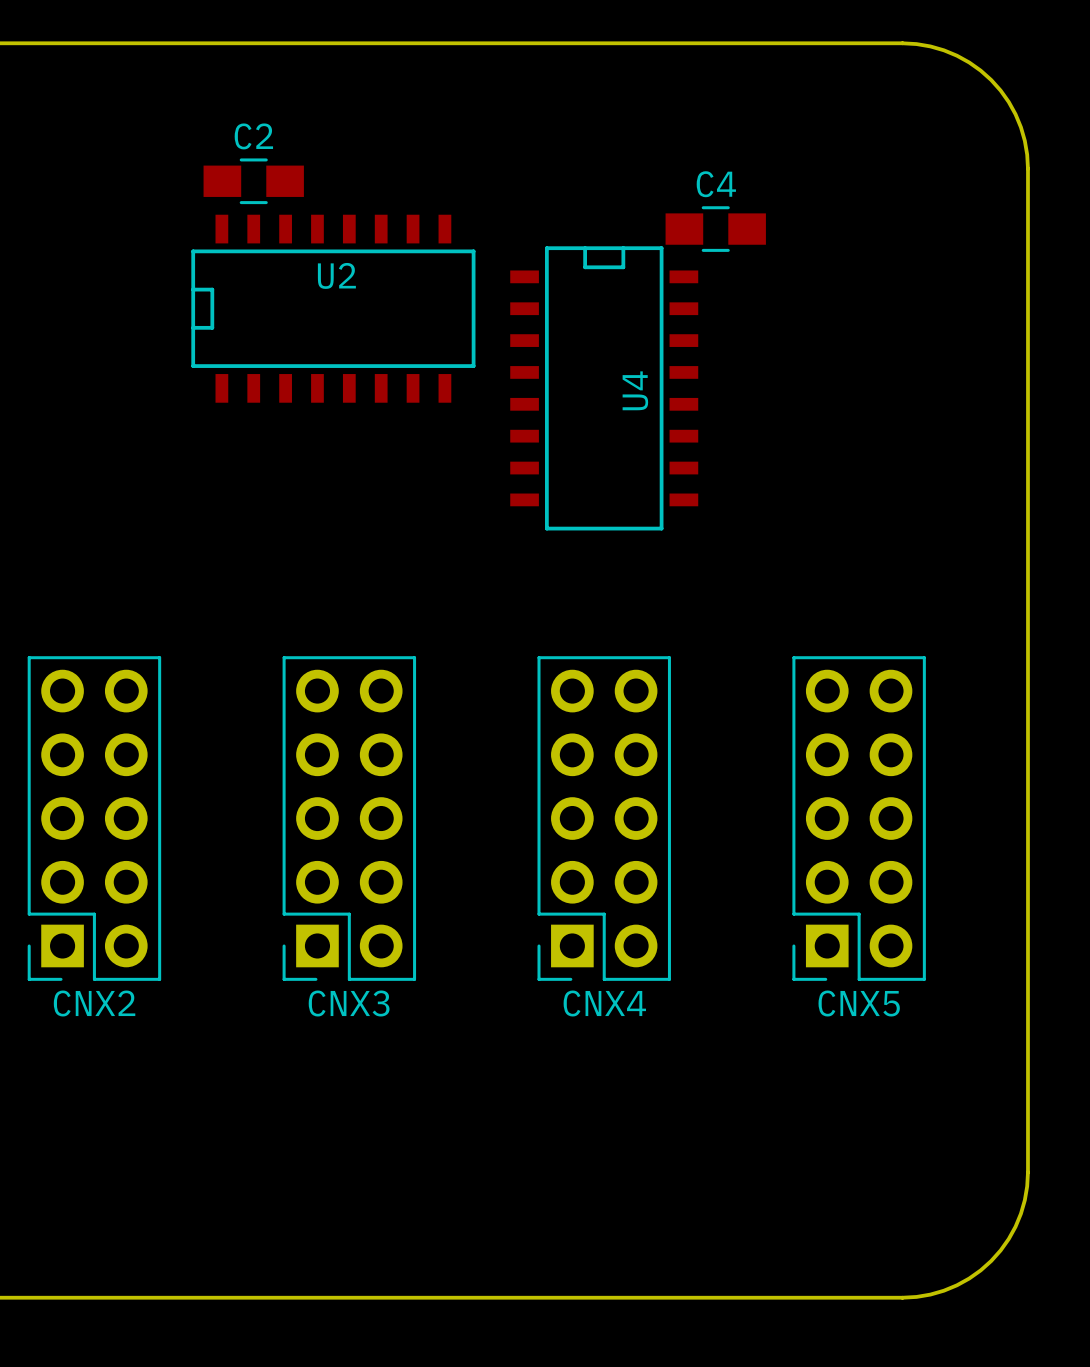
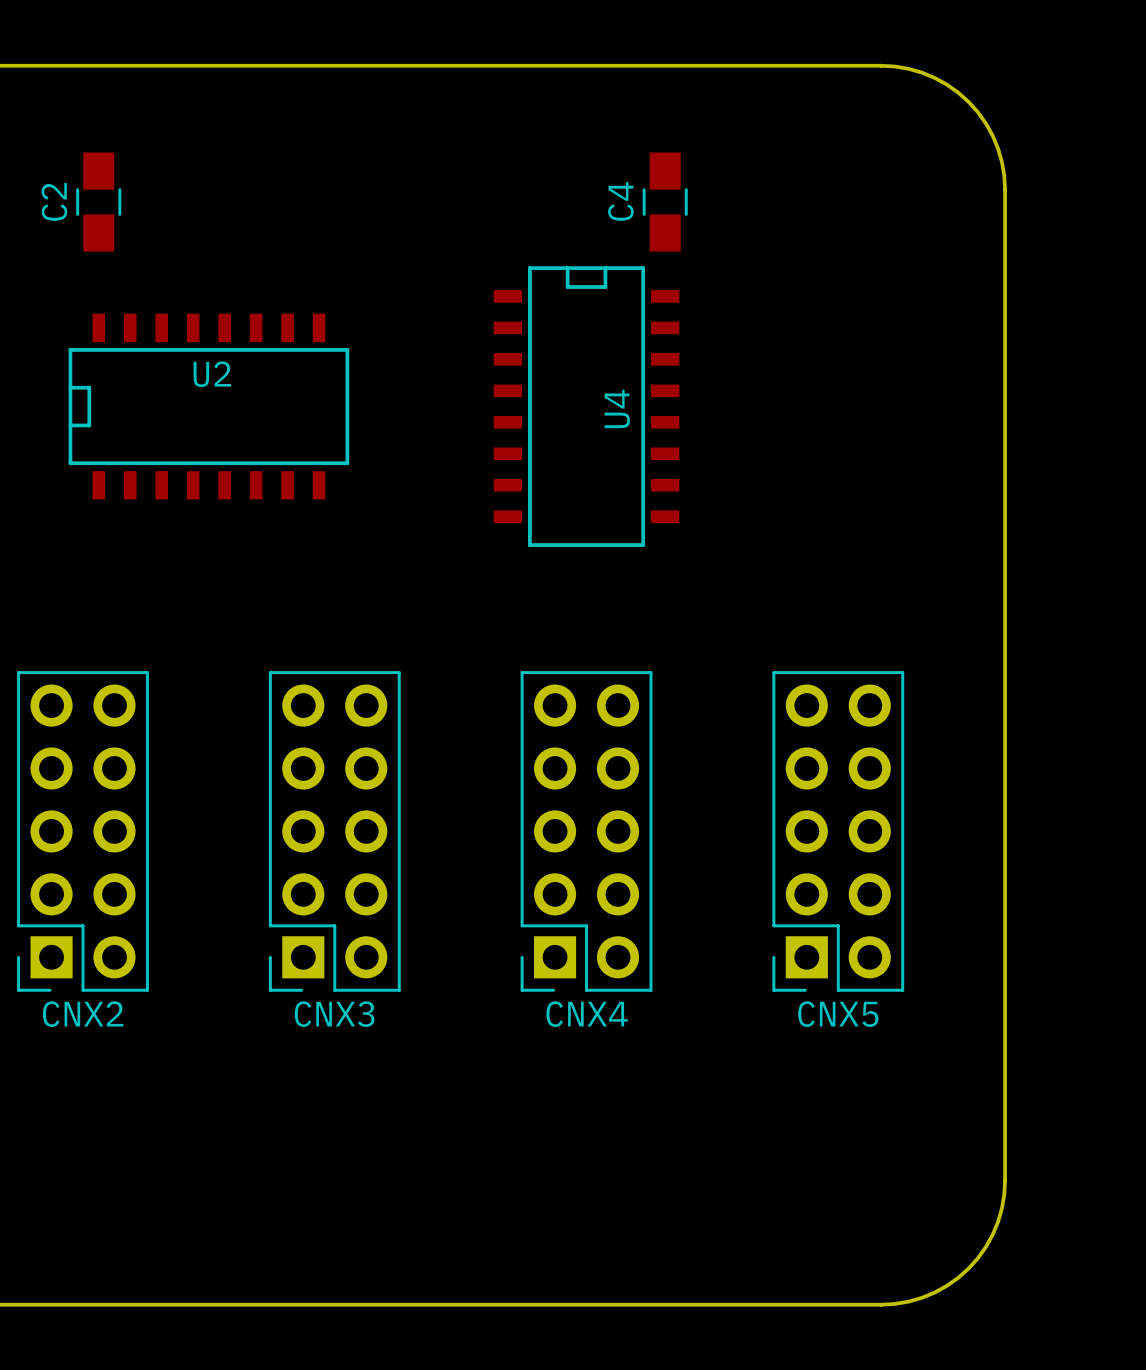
C2 name position: C2 (253, 136) -> C2 (54, 201)
C2 rotation: 0° (253, 181) -> 90° clockwise (98, 202)
C2 position: (253, 181) -> (98, 202)
C4 name position: C4 (716, 184) -> C4 (620, 201)
C4 rotation: 0° (715, 229) -> 90° clockwise (665, 202)
U2 position: (333, 308) -> (208, 406)

